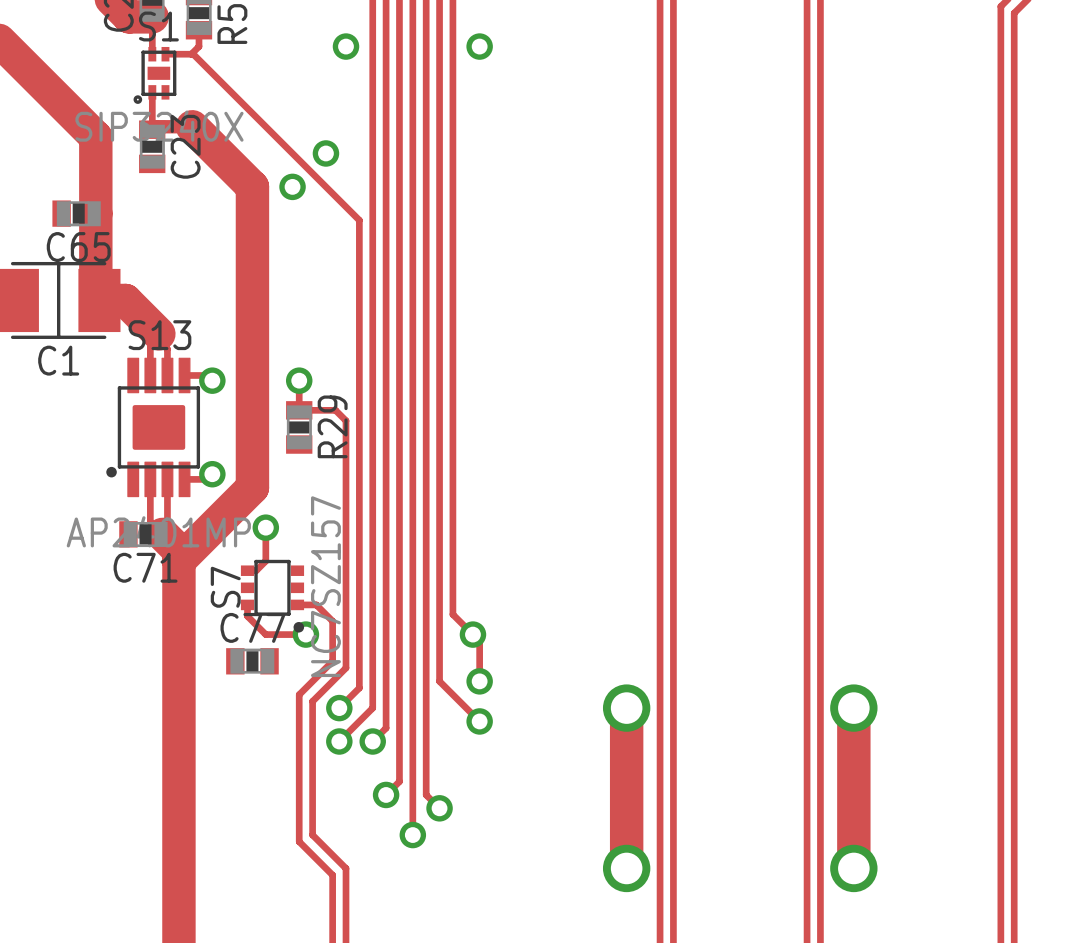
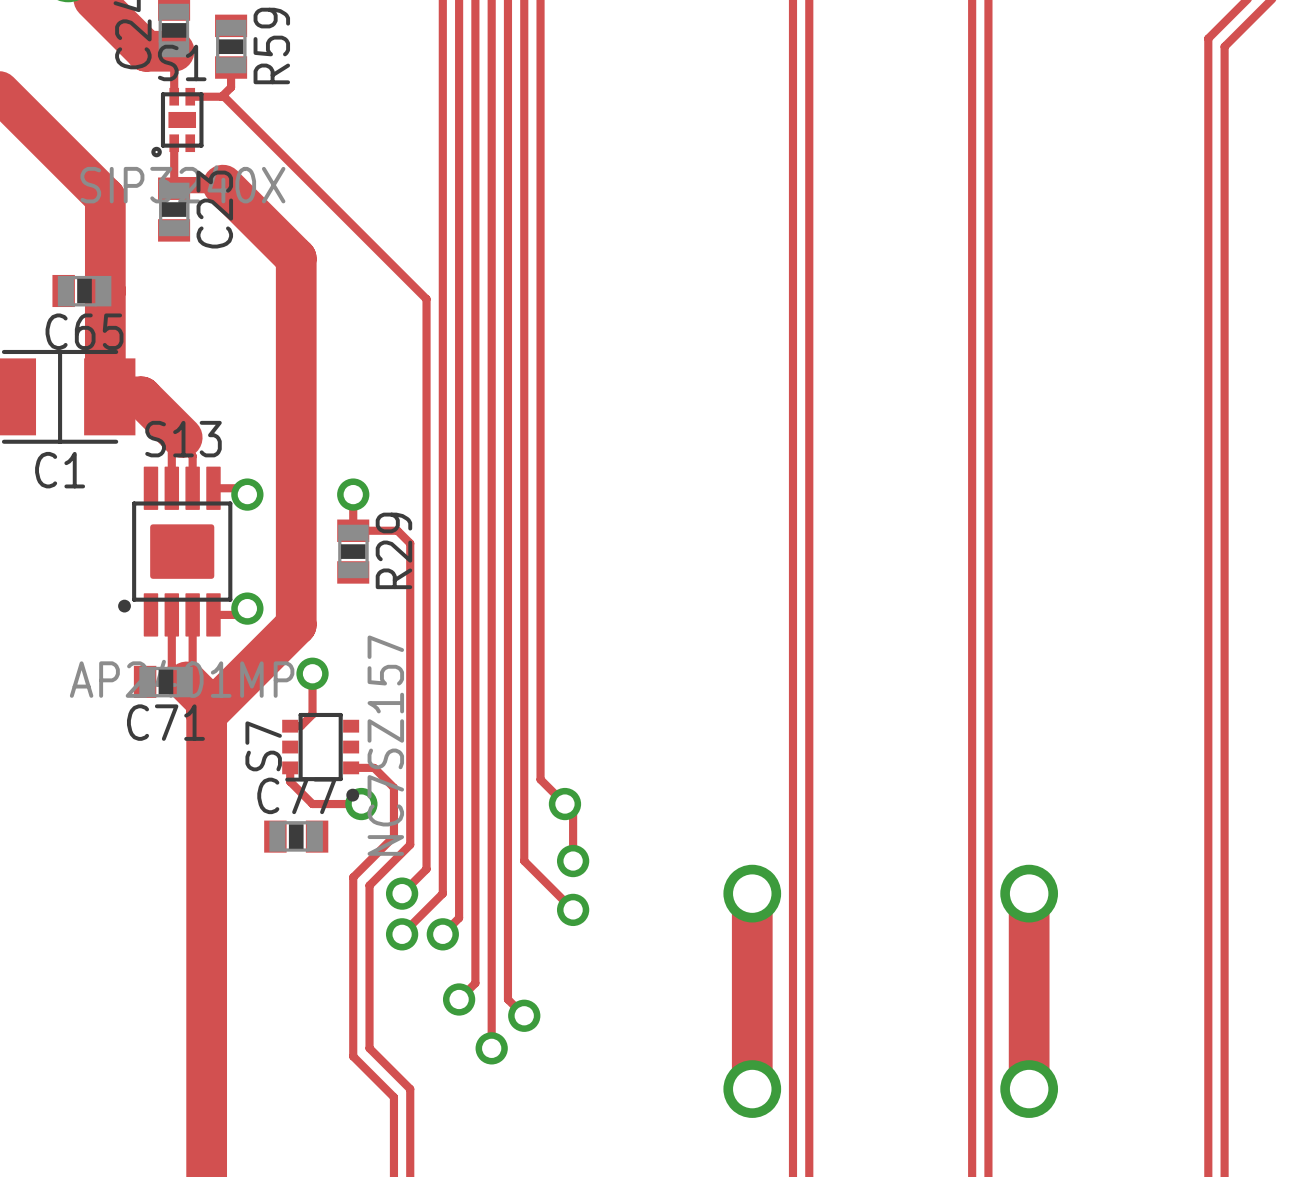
via: (346, 46) -> none
via: (479, 46) -> none
via: (325, 153) -> none
via: (292, 186) -> none

